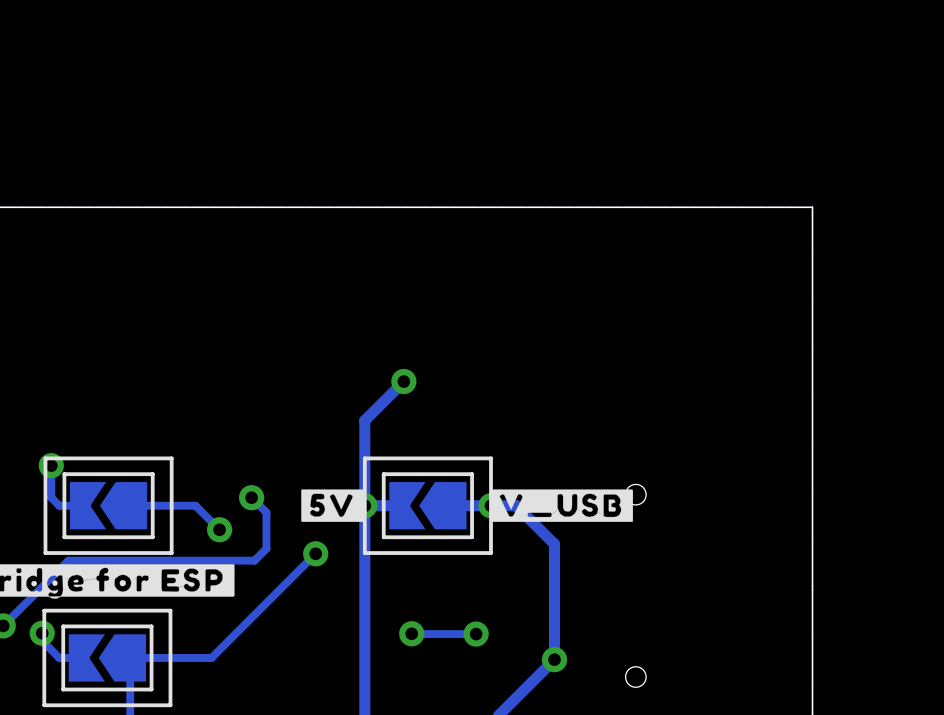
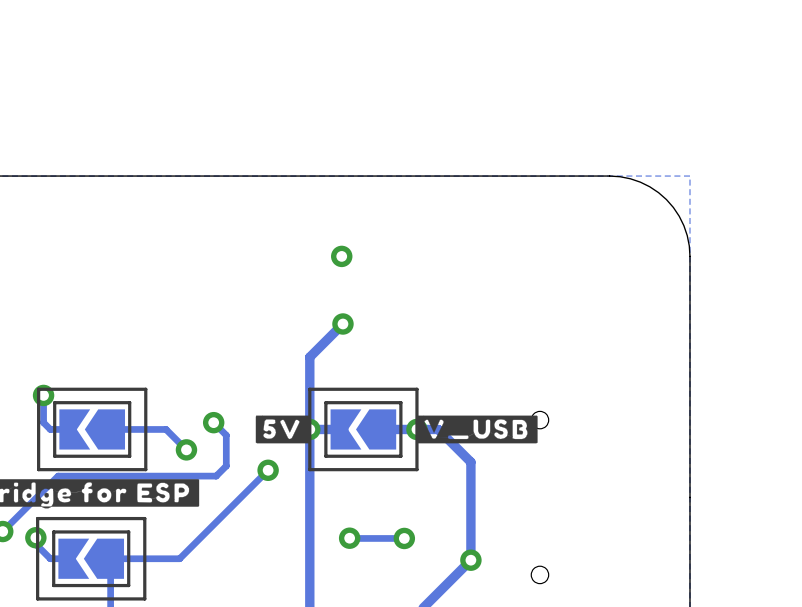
board edge: (717, 207) (812, 207) (812, 301) -> (609, 176) (640, 182) (666, 199) (683, 225) (689, 256)
via: none -> (341, 256)

